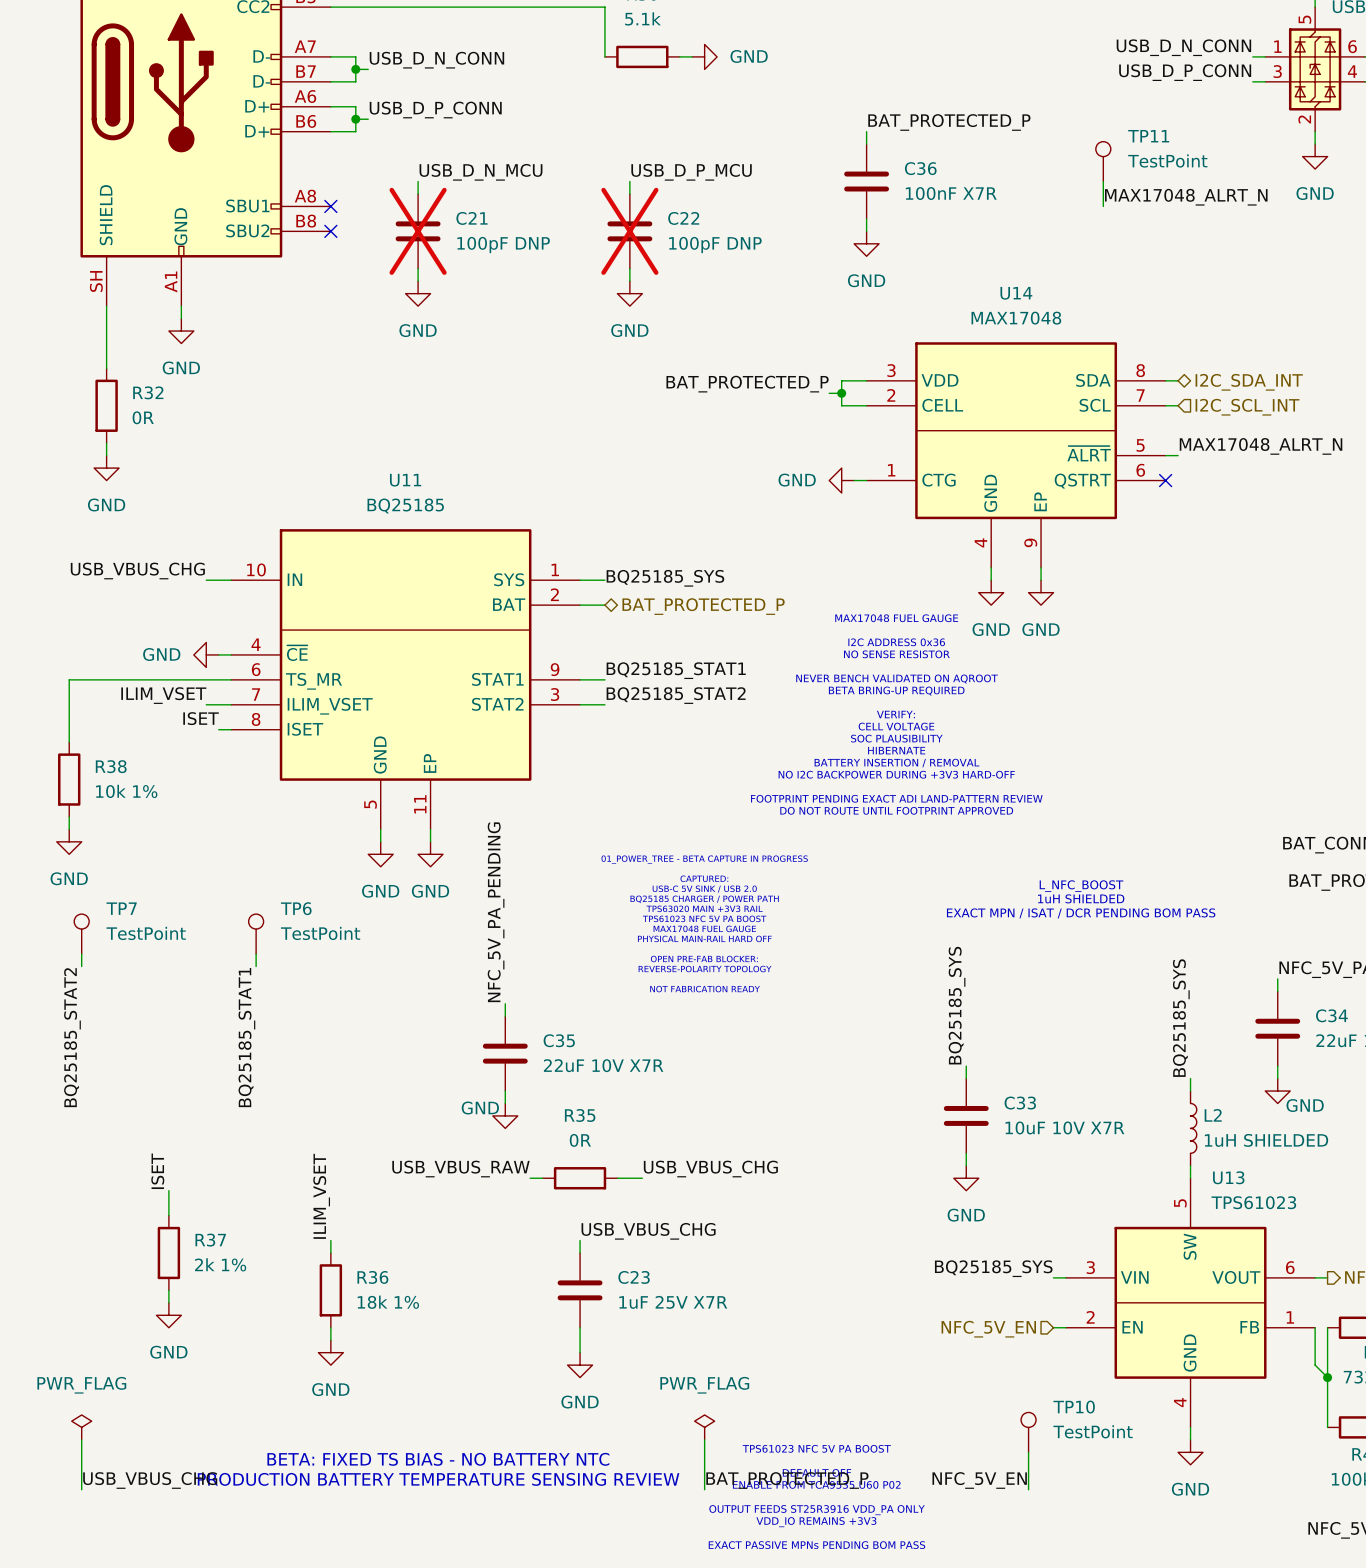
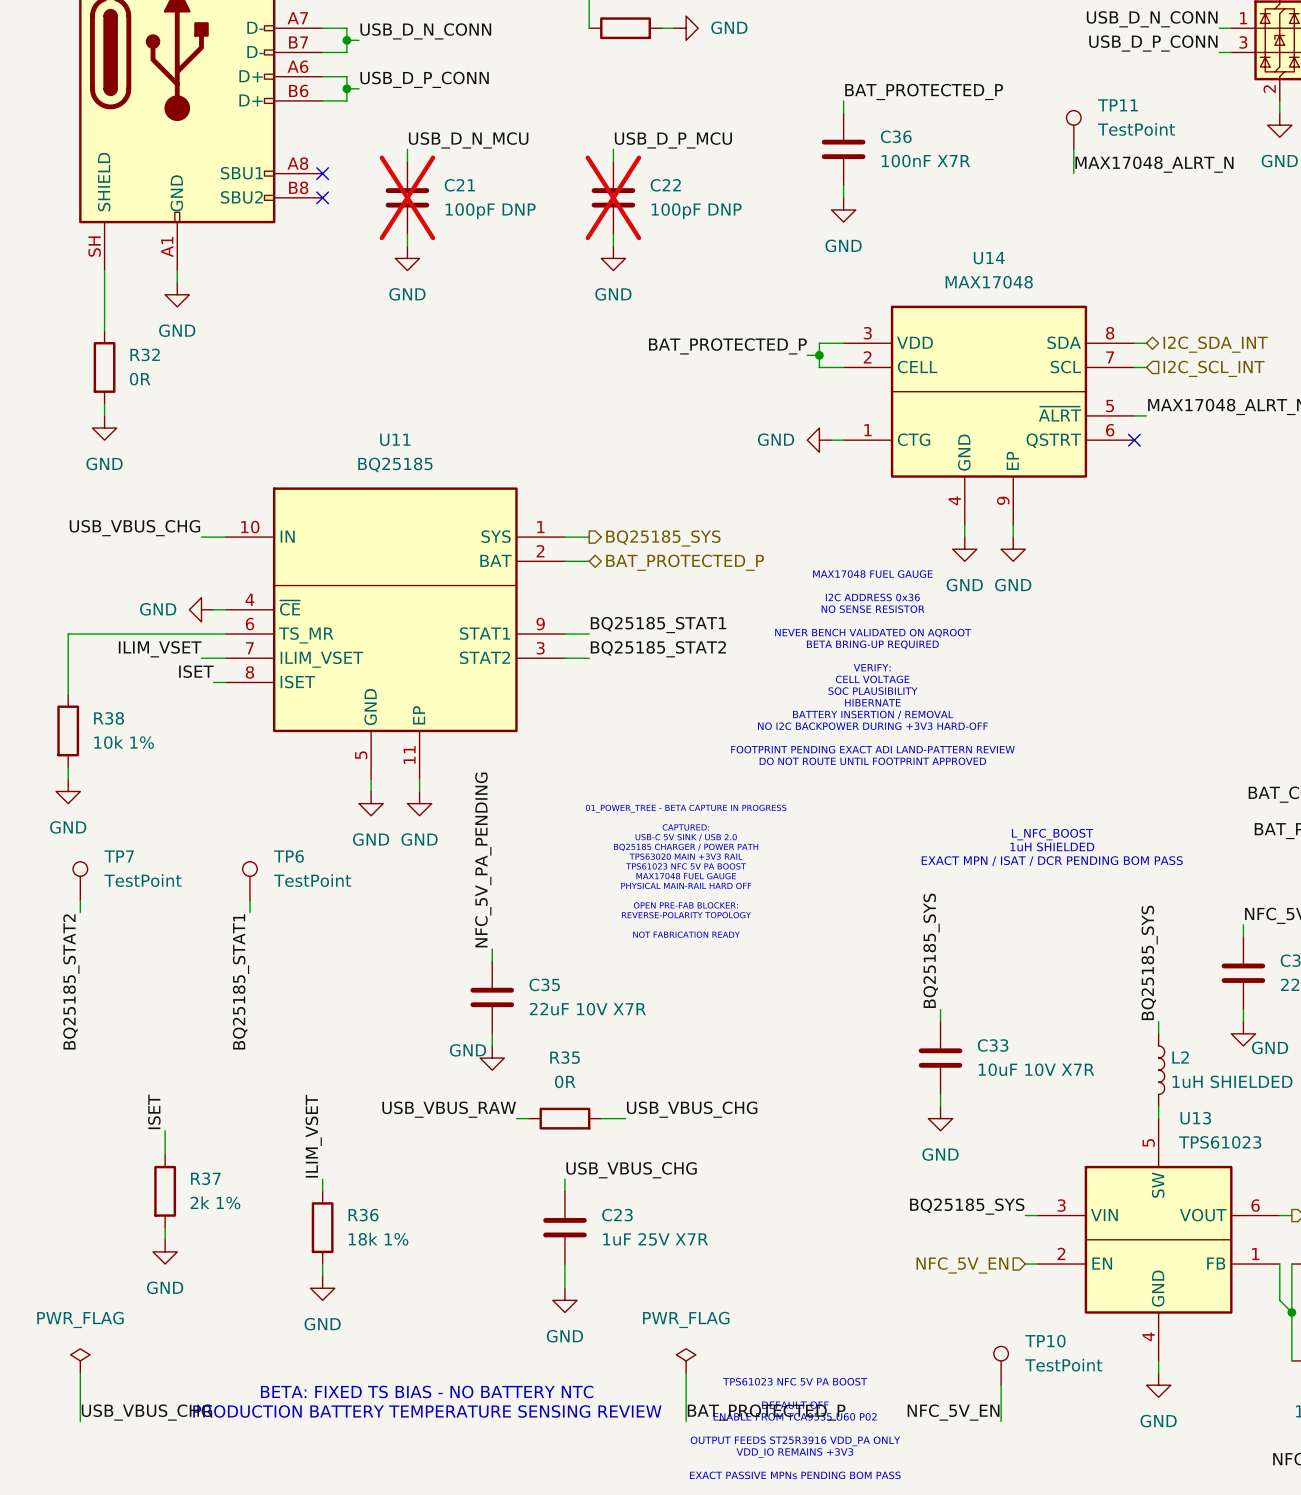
label: BQ25185_SYS (665, 578) -> none
hierarchical label: none -> BQ25185_SYS (663, 538)

